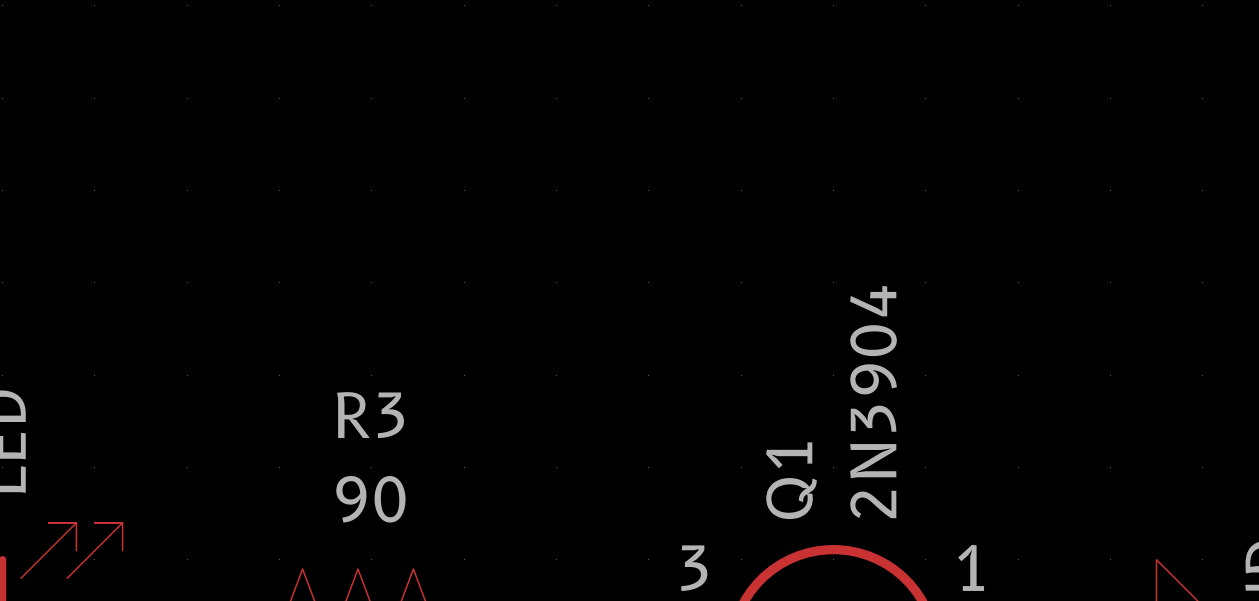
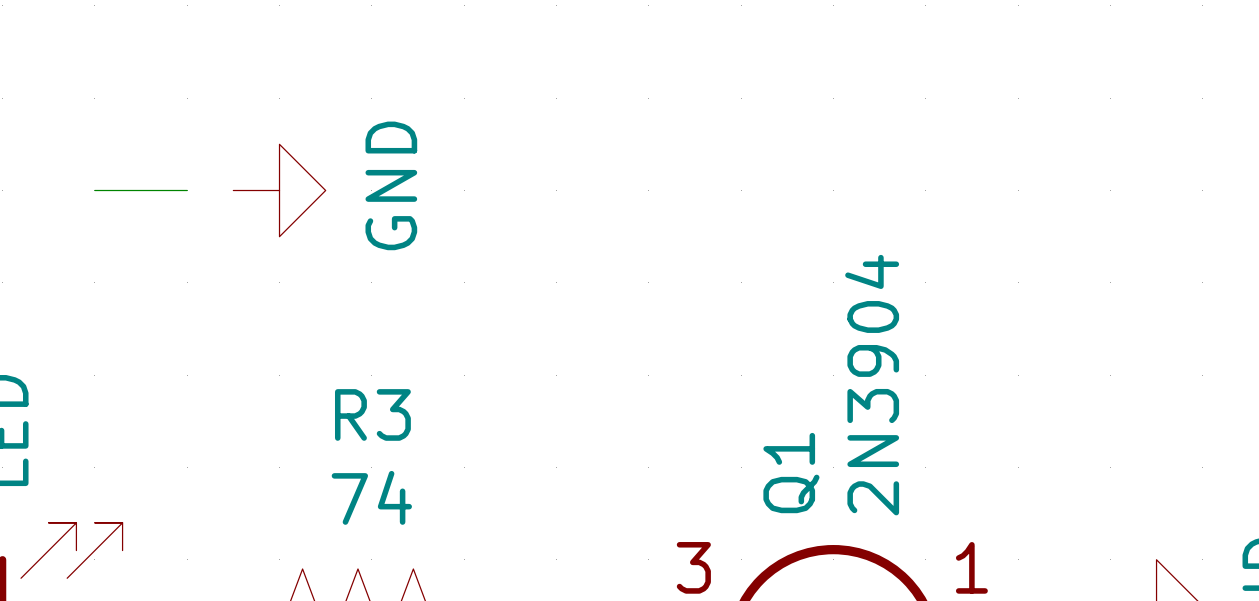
wire: none -> (94, 190) (187, 190)
power symbol: none -> GND (279, 190)
R3 value: 90 (370, 499) -> 74 (371, 497)

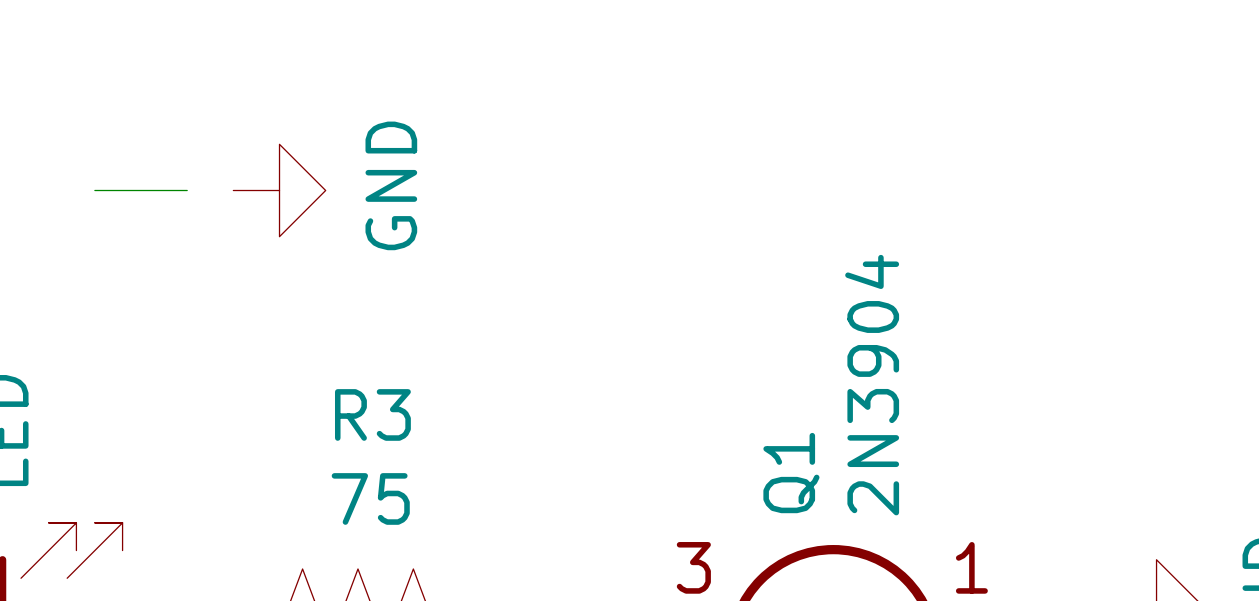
R3 value: 74 (371, 497) -> 75 (370, 498)

